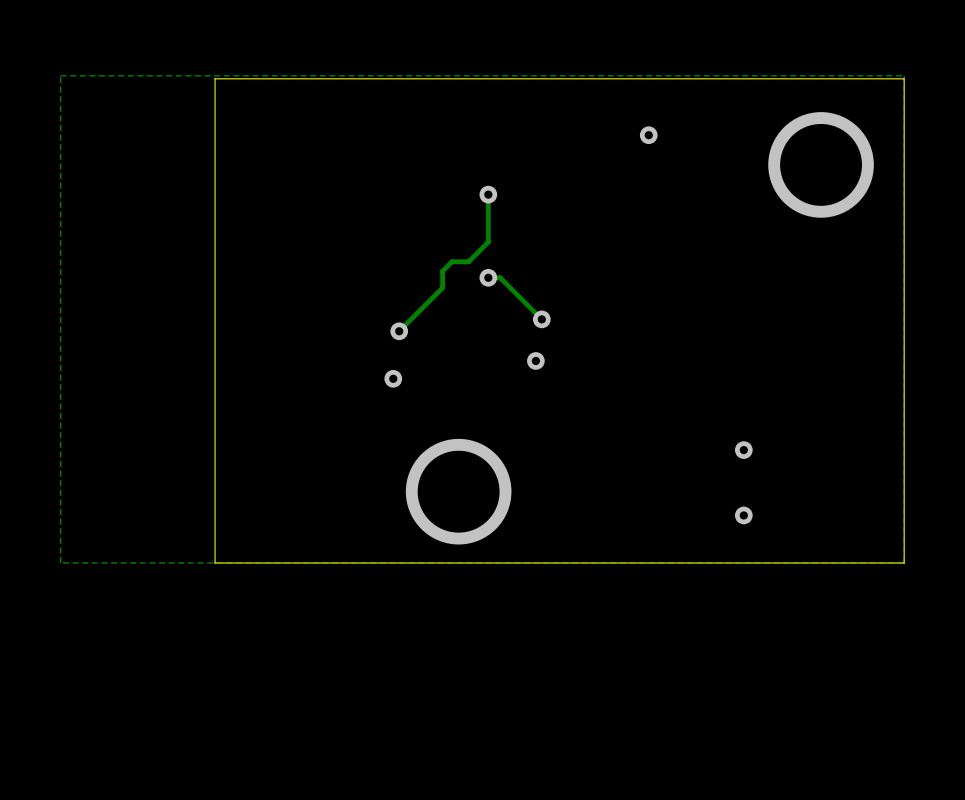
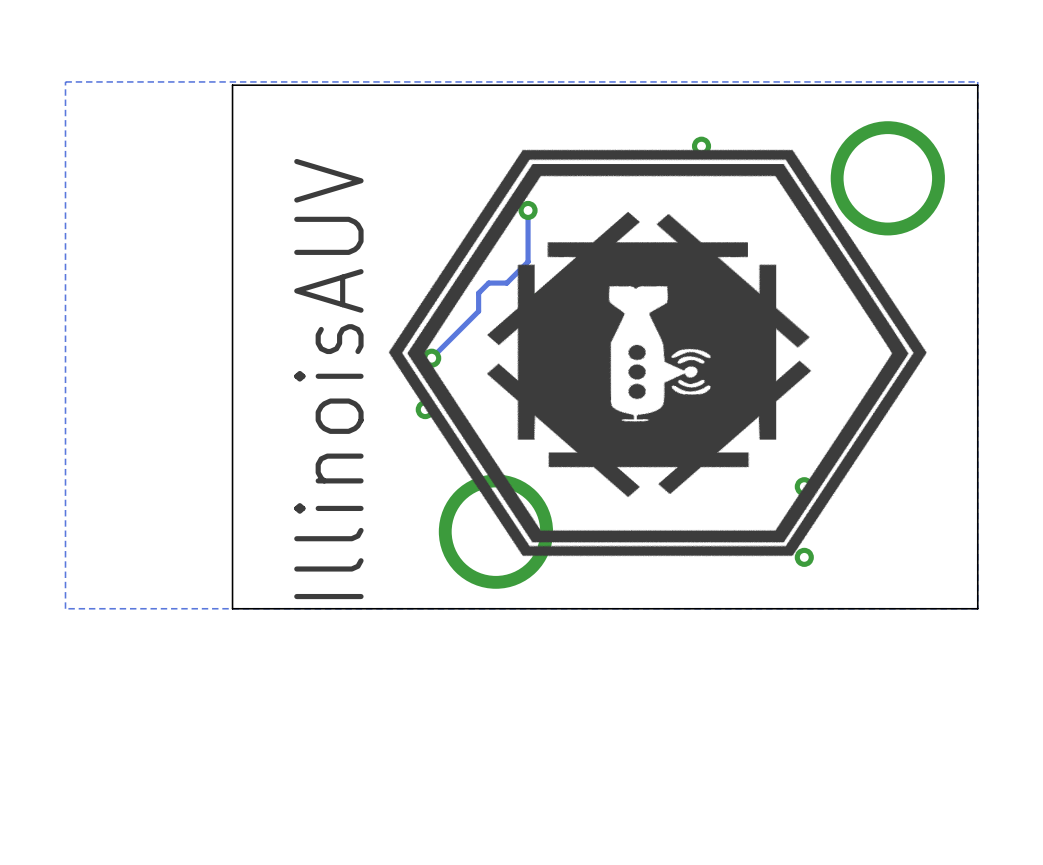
drawing: none -> [388, 149, 927, 557]

